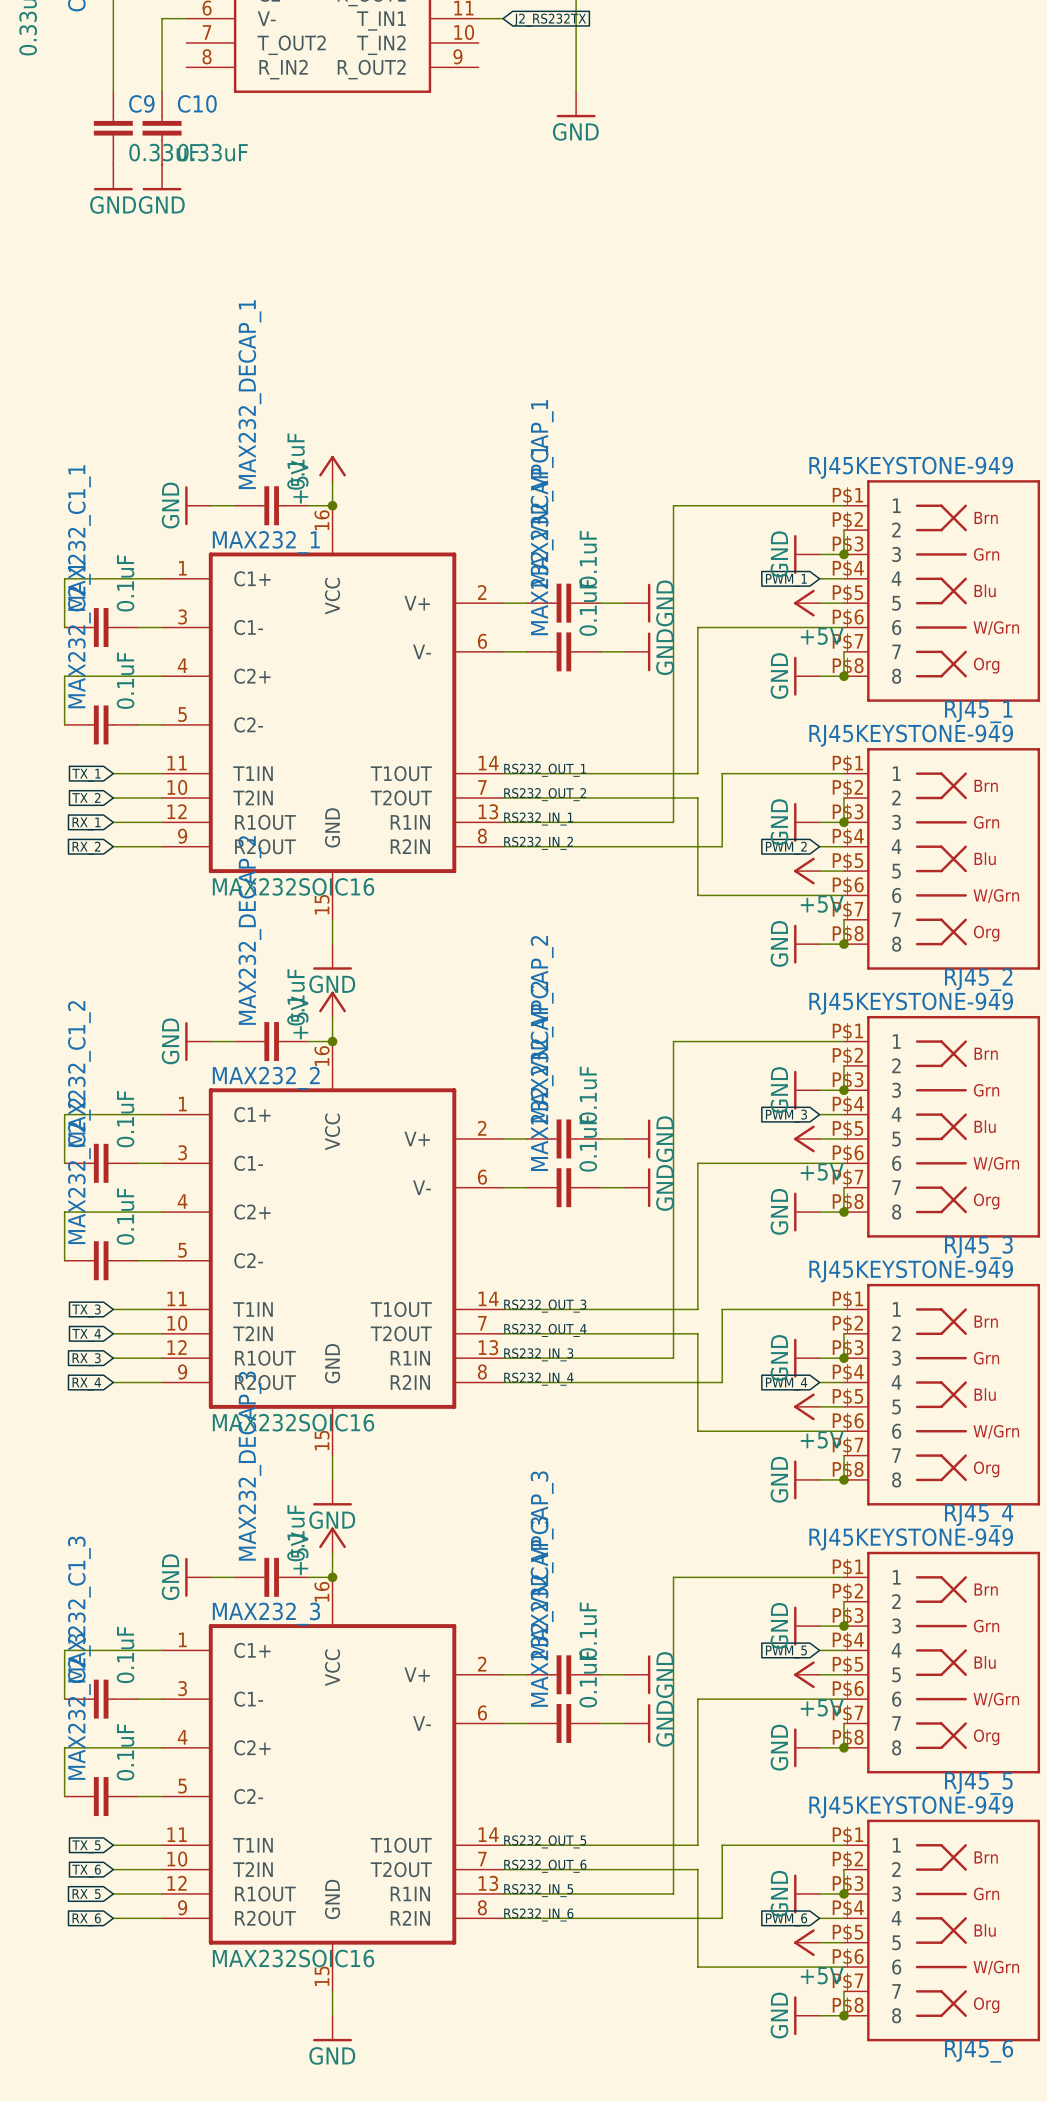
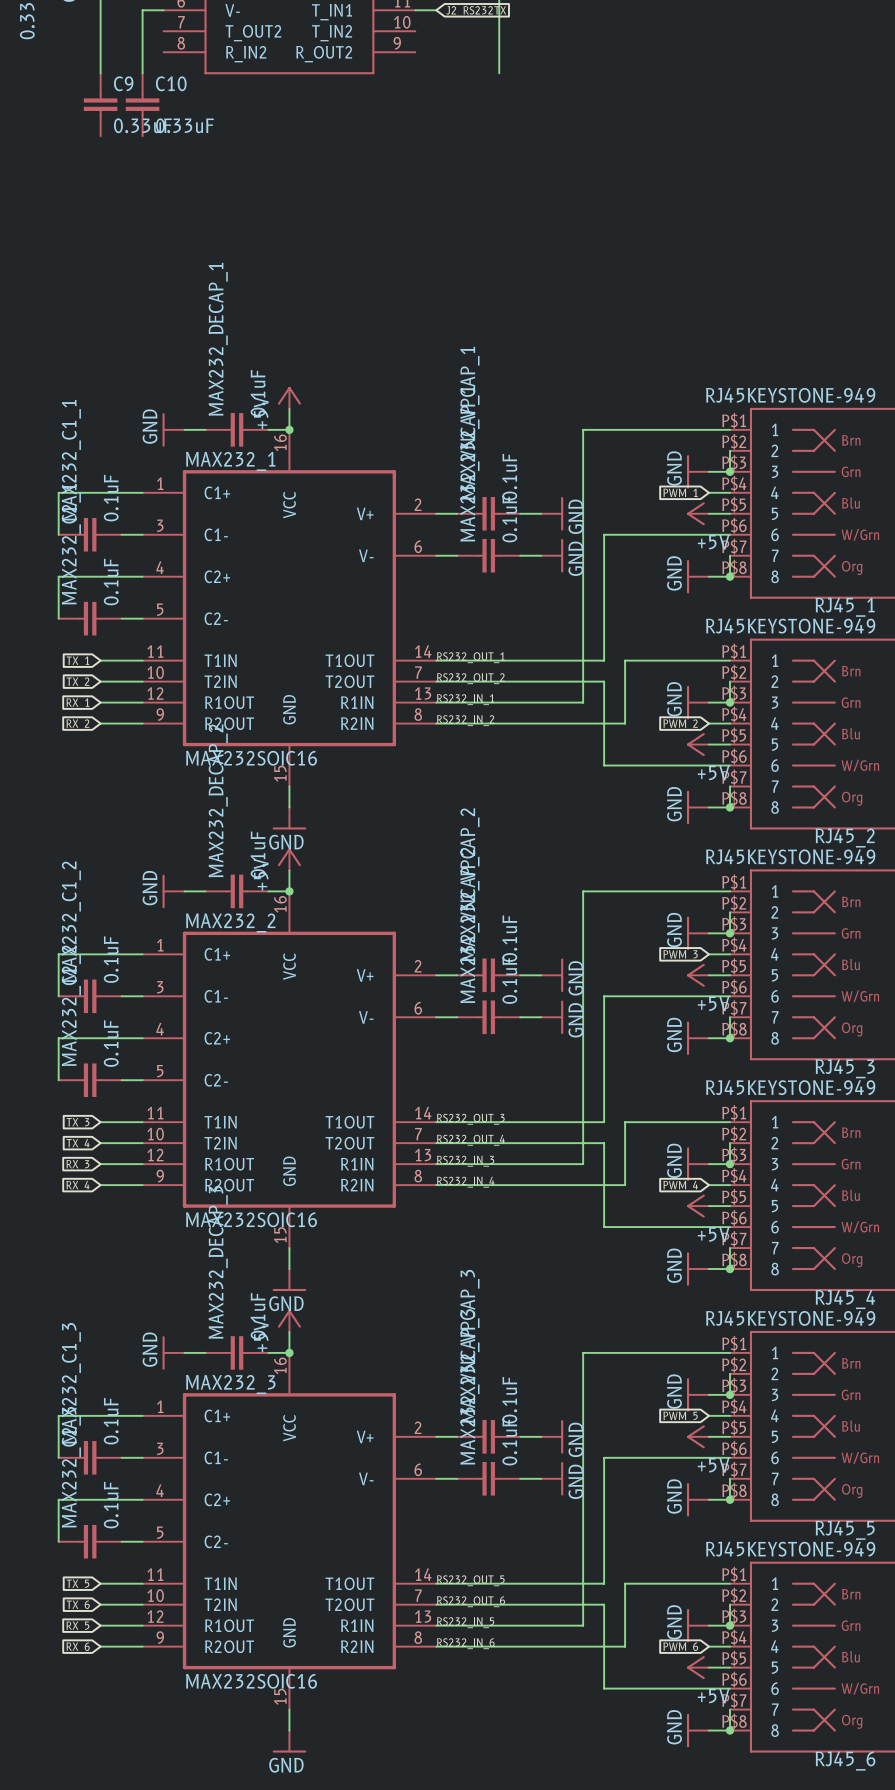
power symbol: GND (576, 104) -> none
power symbol: GND (113, 177) -> none
power symbol: GND (162, 177) -> none

